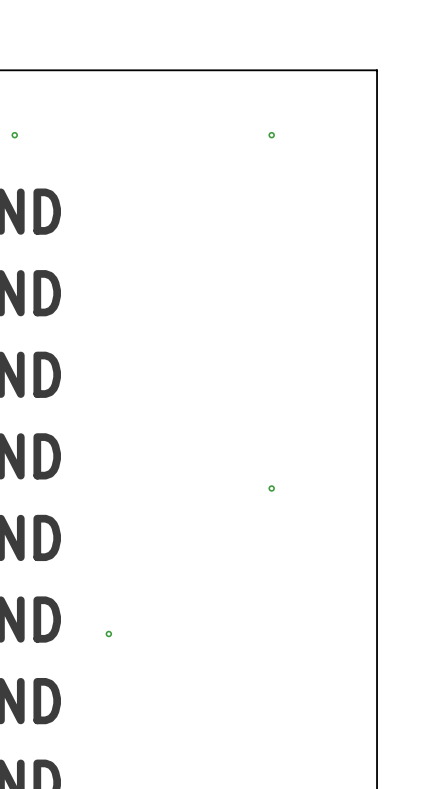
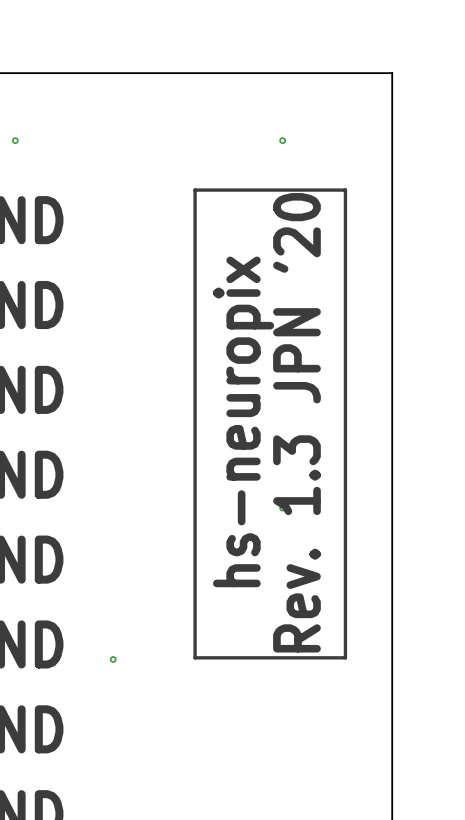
line: none -> (195, 190) (345, 190) (345, 657) (195, 657) (195, 190)
text: none -> hs-neuropix (243, 421)
text: none -> Rev. 1.3 JPN '20 (296, 422)

